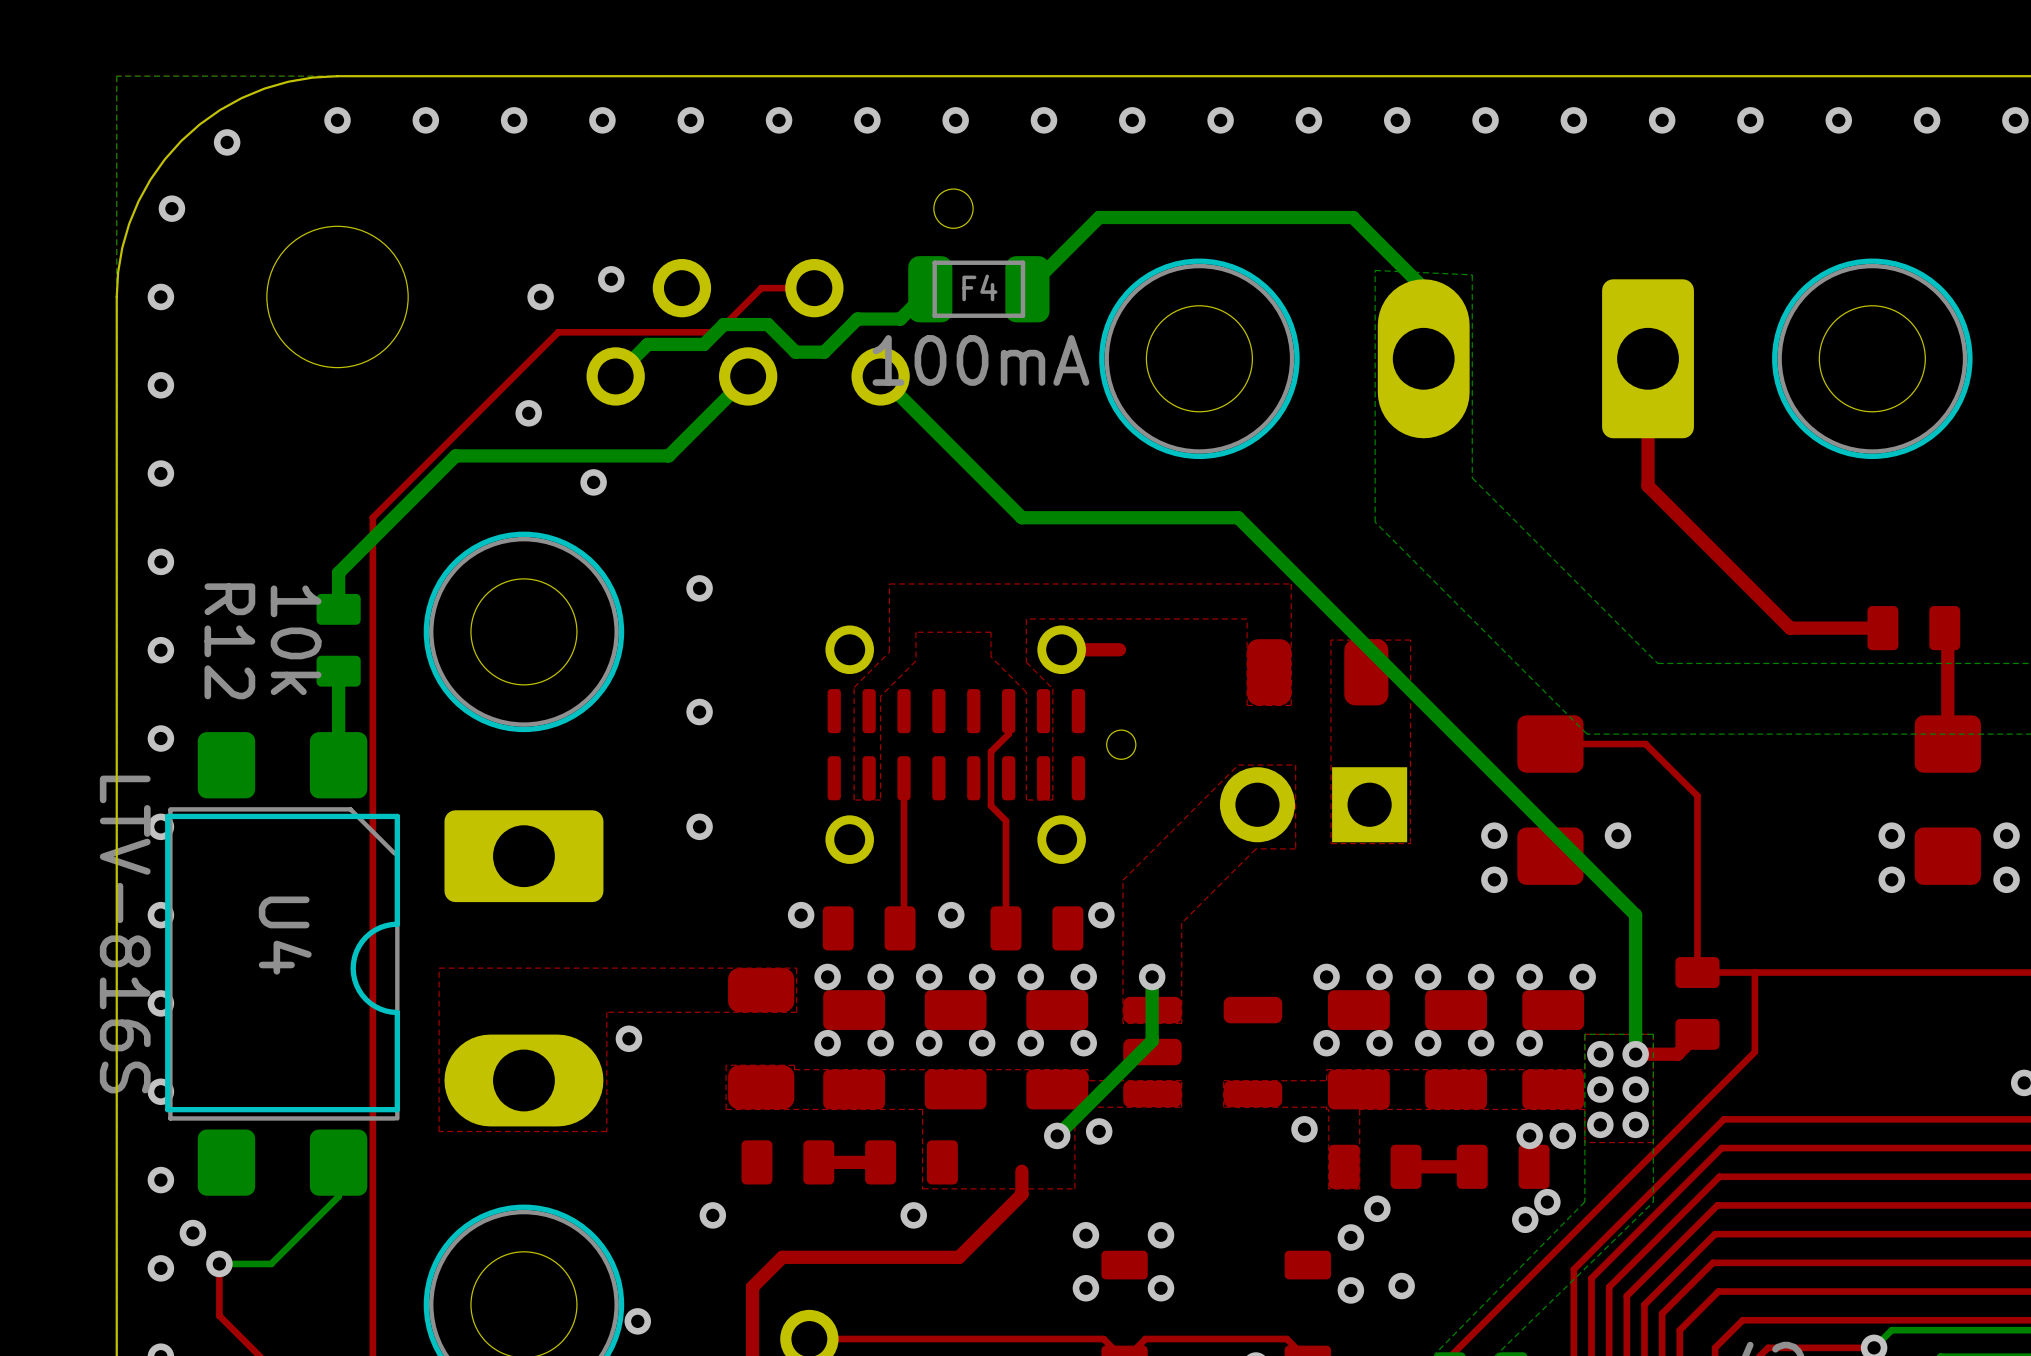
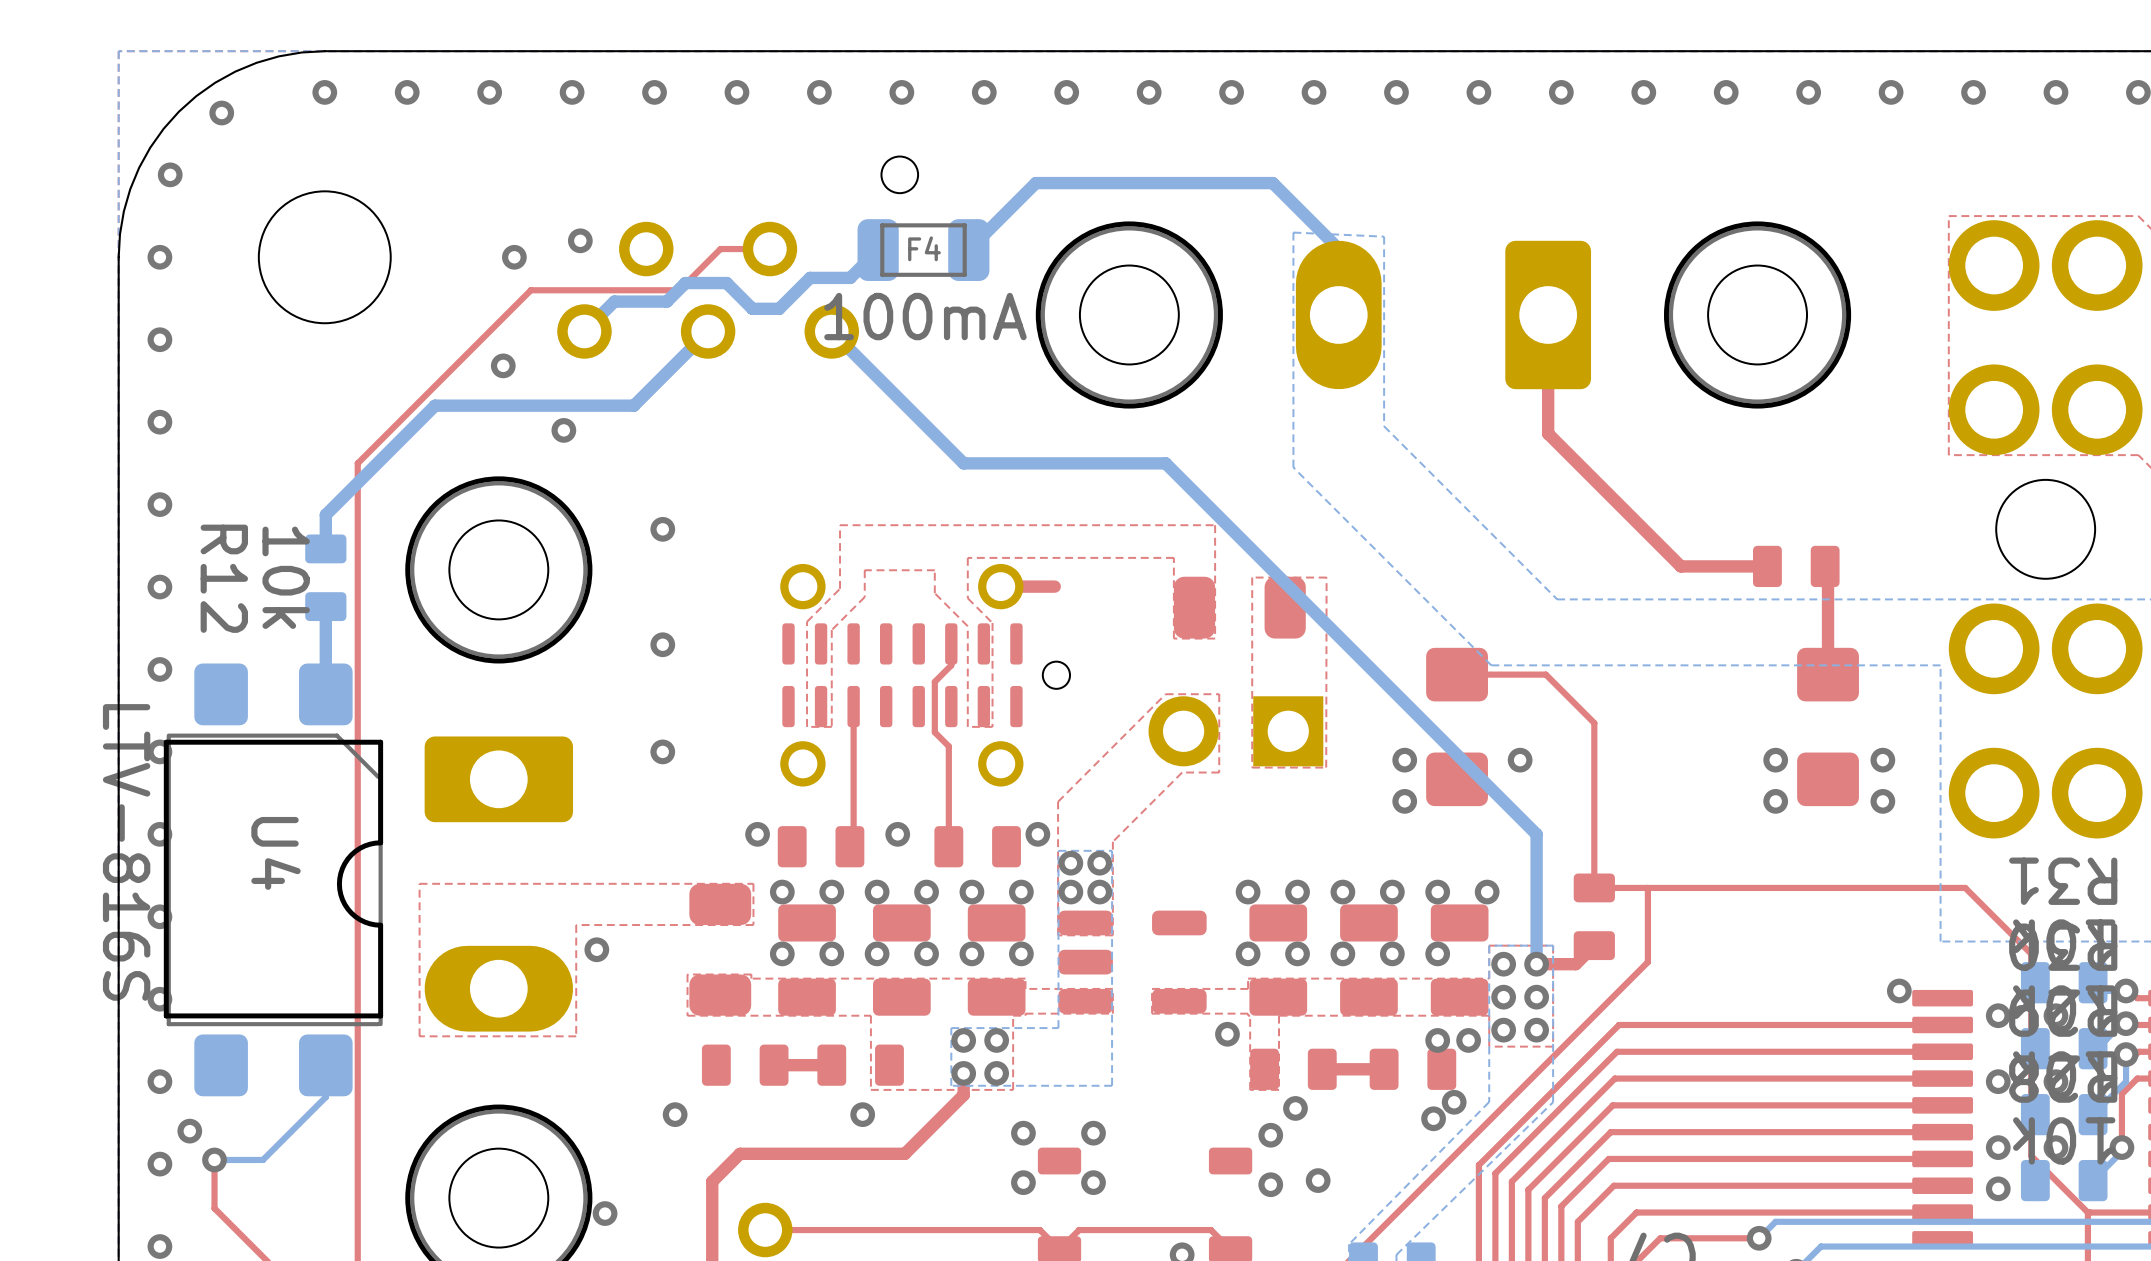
bottom zone outline: none -> (1112, 850) (1112, 1085) (951, 1085) (951, 1028) (1058, 1028) (1058, 850) (1112, 850)
via: none -> (1070, 863)
via: none -> (1099, 863)
via: none -> (1070, 892)
bottom track: (1152, 976) (1152, 1040) (1057, 1135) -> none
via: (1152, 976) -> none
via: none -> (1099, 892)
via: (1099, 1131) -> none
via: none -> (963, 1040)
via: none -> (963, 1073)
via: none -> (996, 1073)

